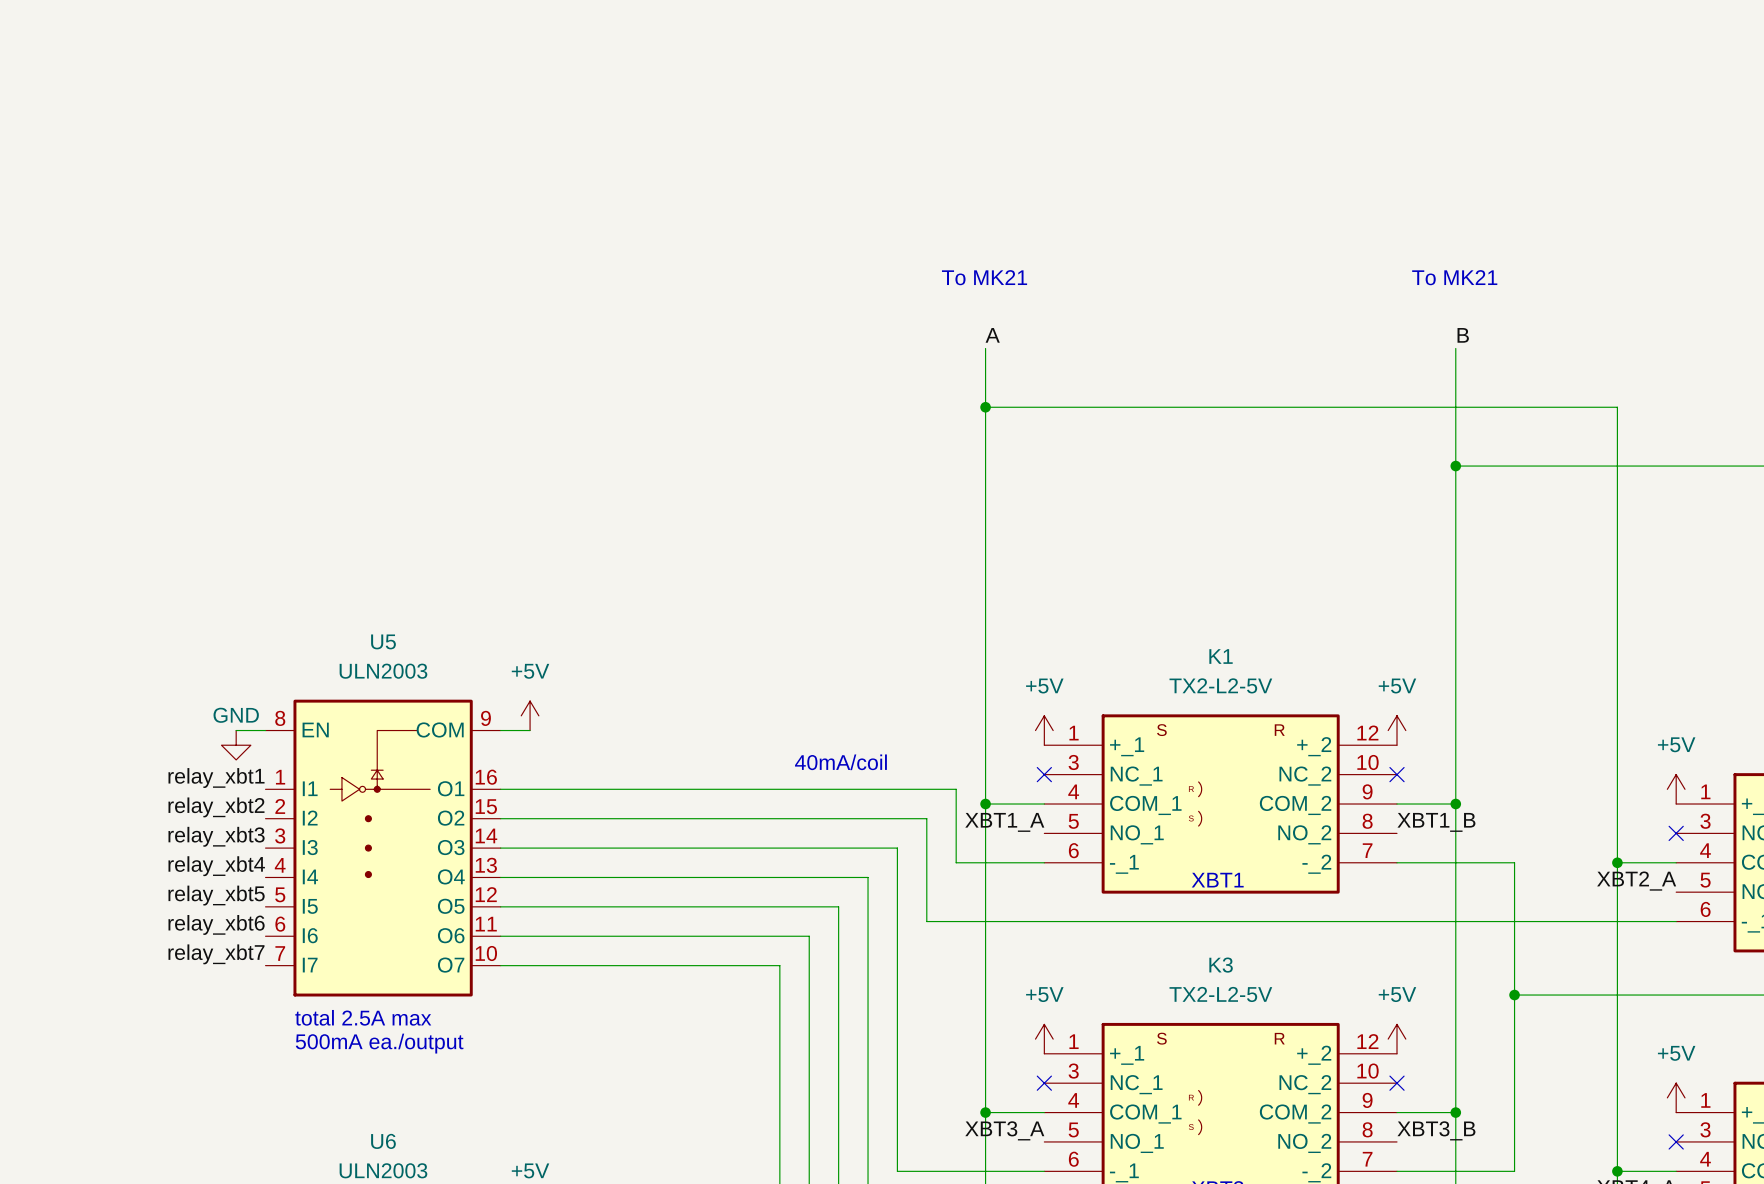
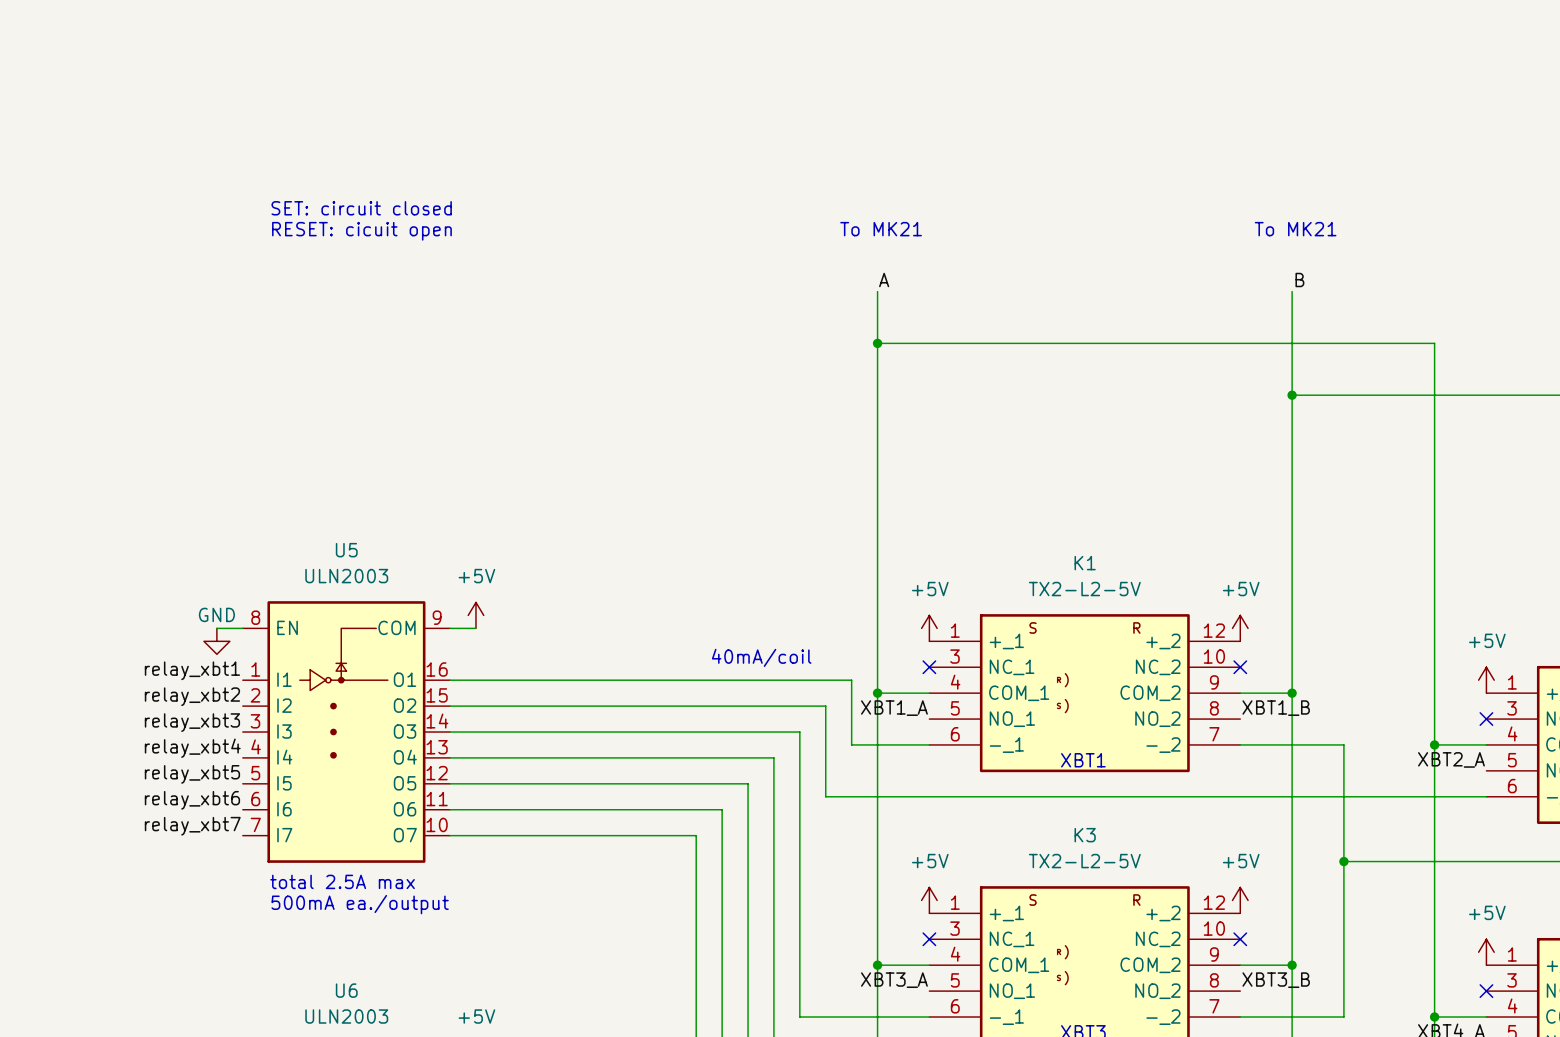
text: none -> SET: circuit closed (361, 208)
text: none -> RESET: cicuit open (361, 231)

